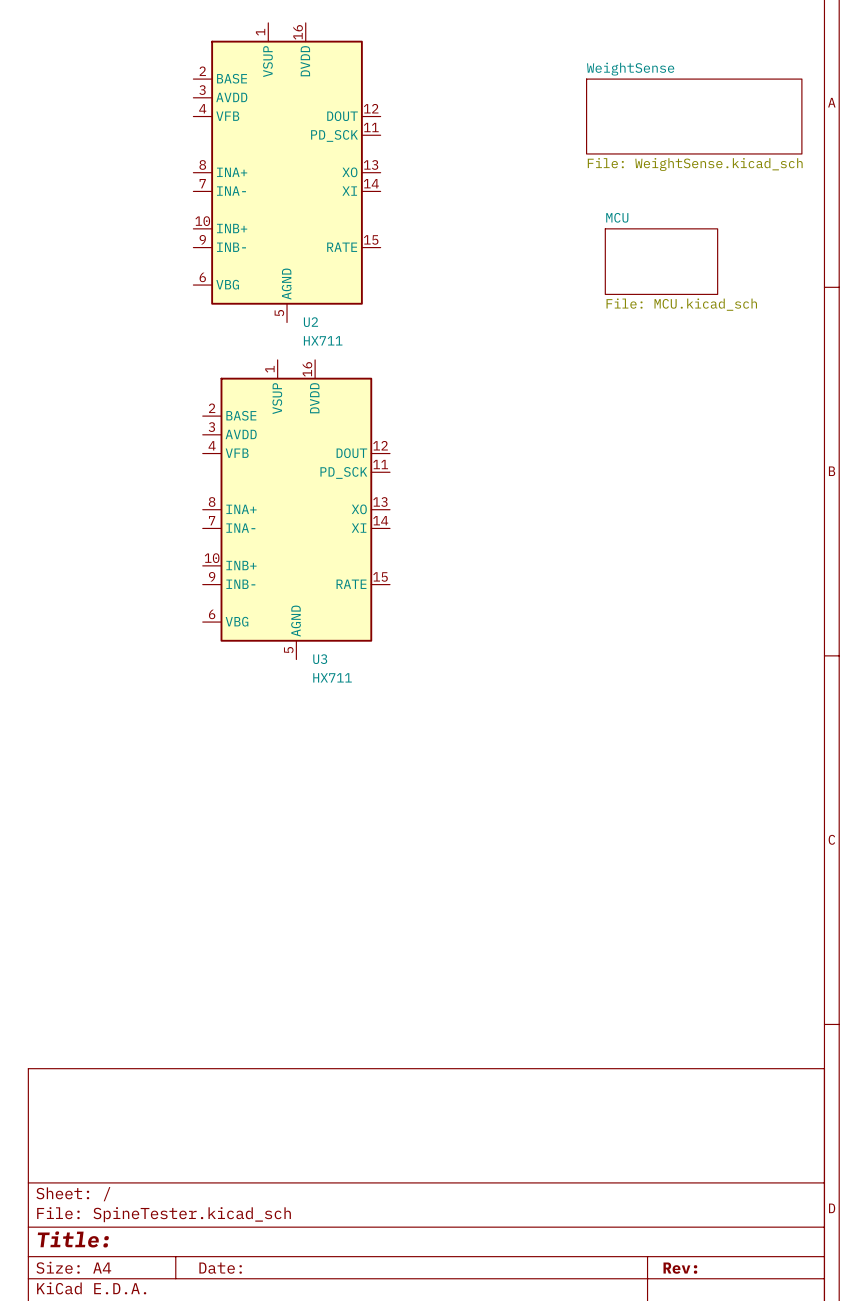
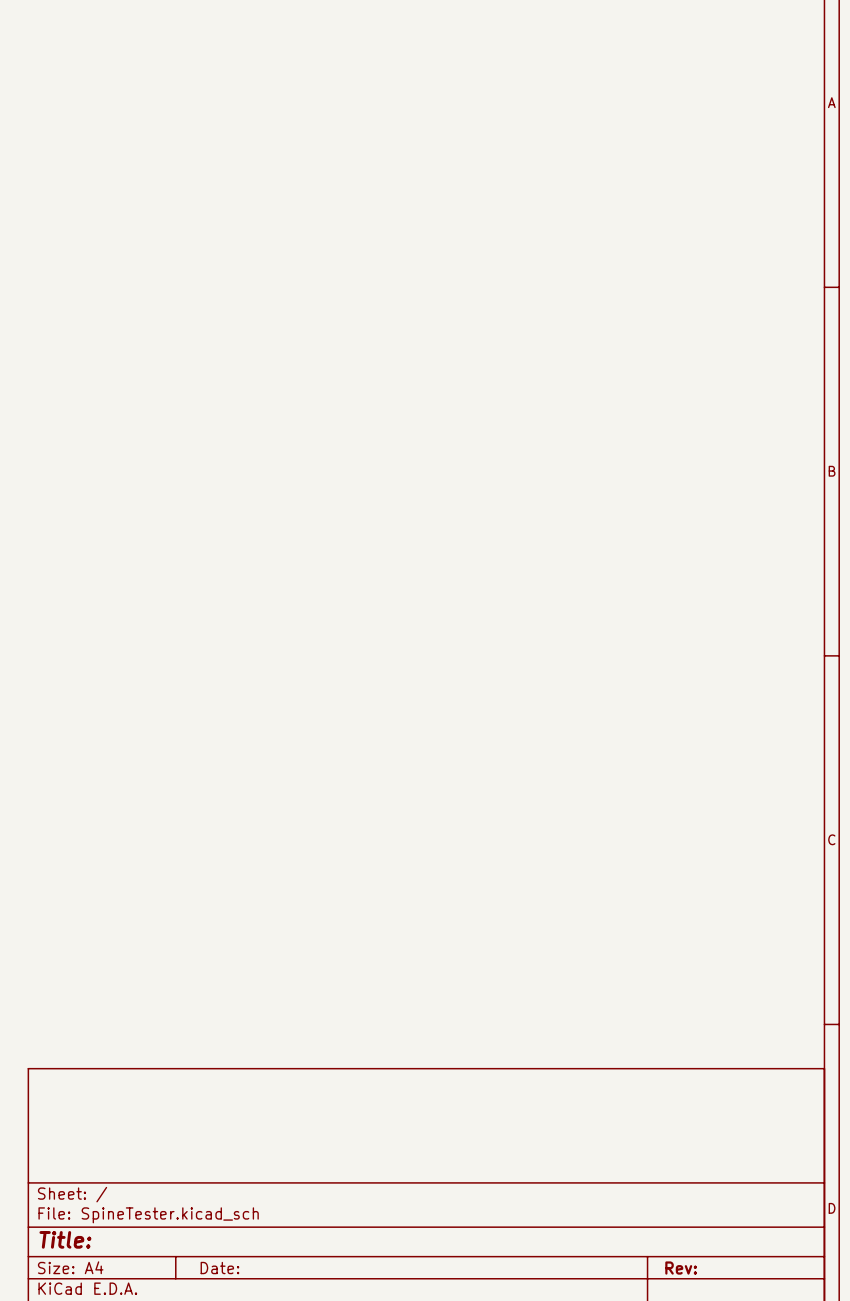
sheet WeightSense: File: WeightSense.kicad_sch (694, 116) -> none
U2: HX711 (287, 172) -> none
sheet MCU: File: MCU.kicad_sch (661, 261) -> none
U3: HX711 (296, 509) -> none

